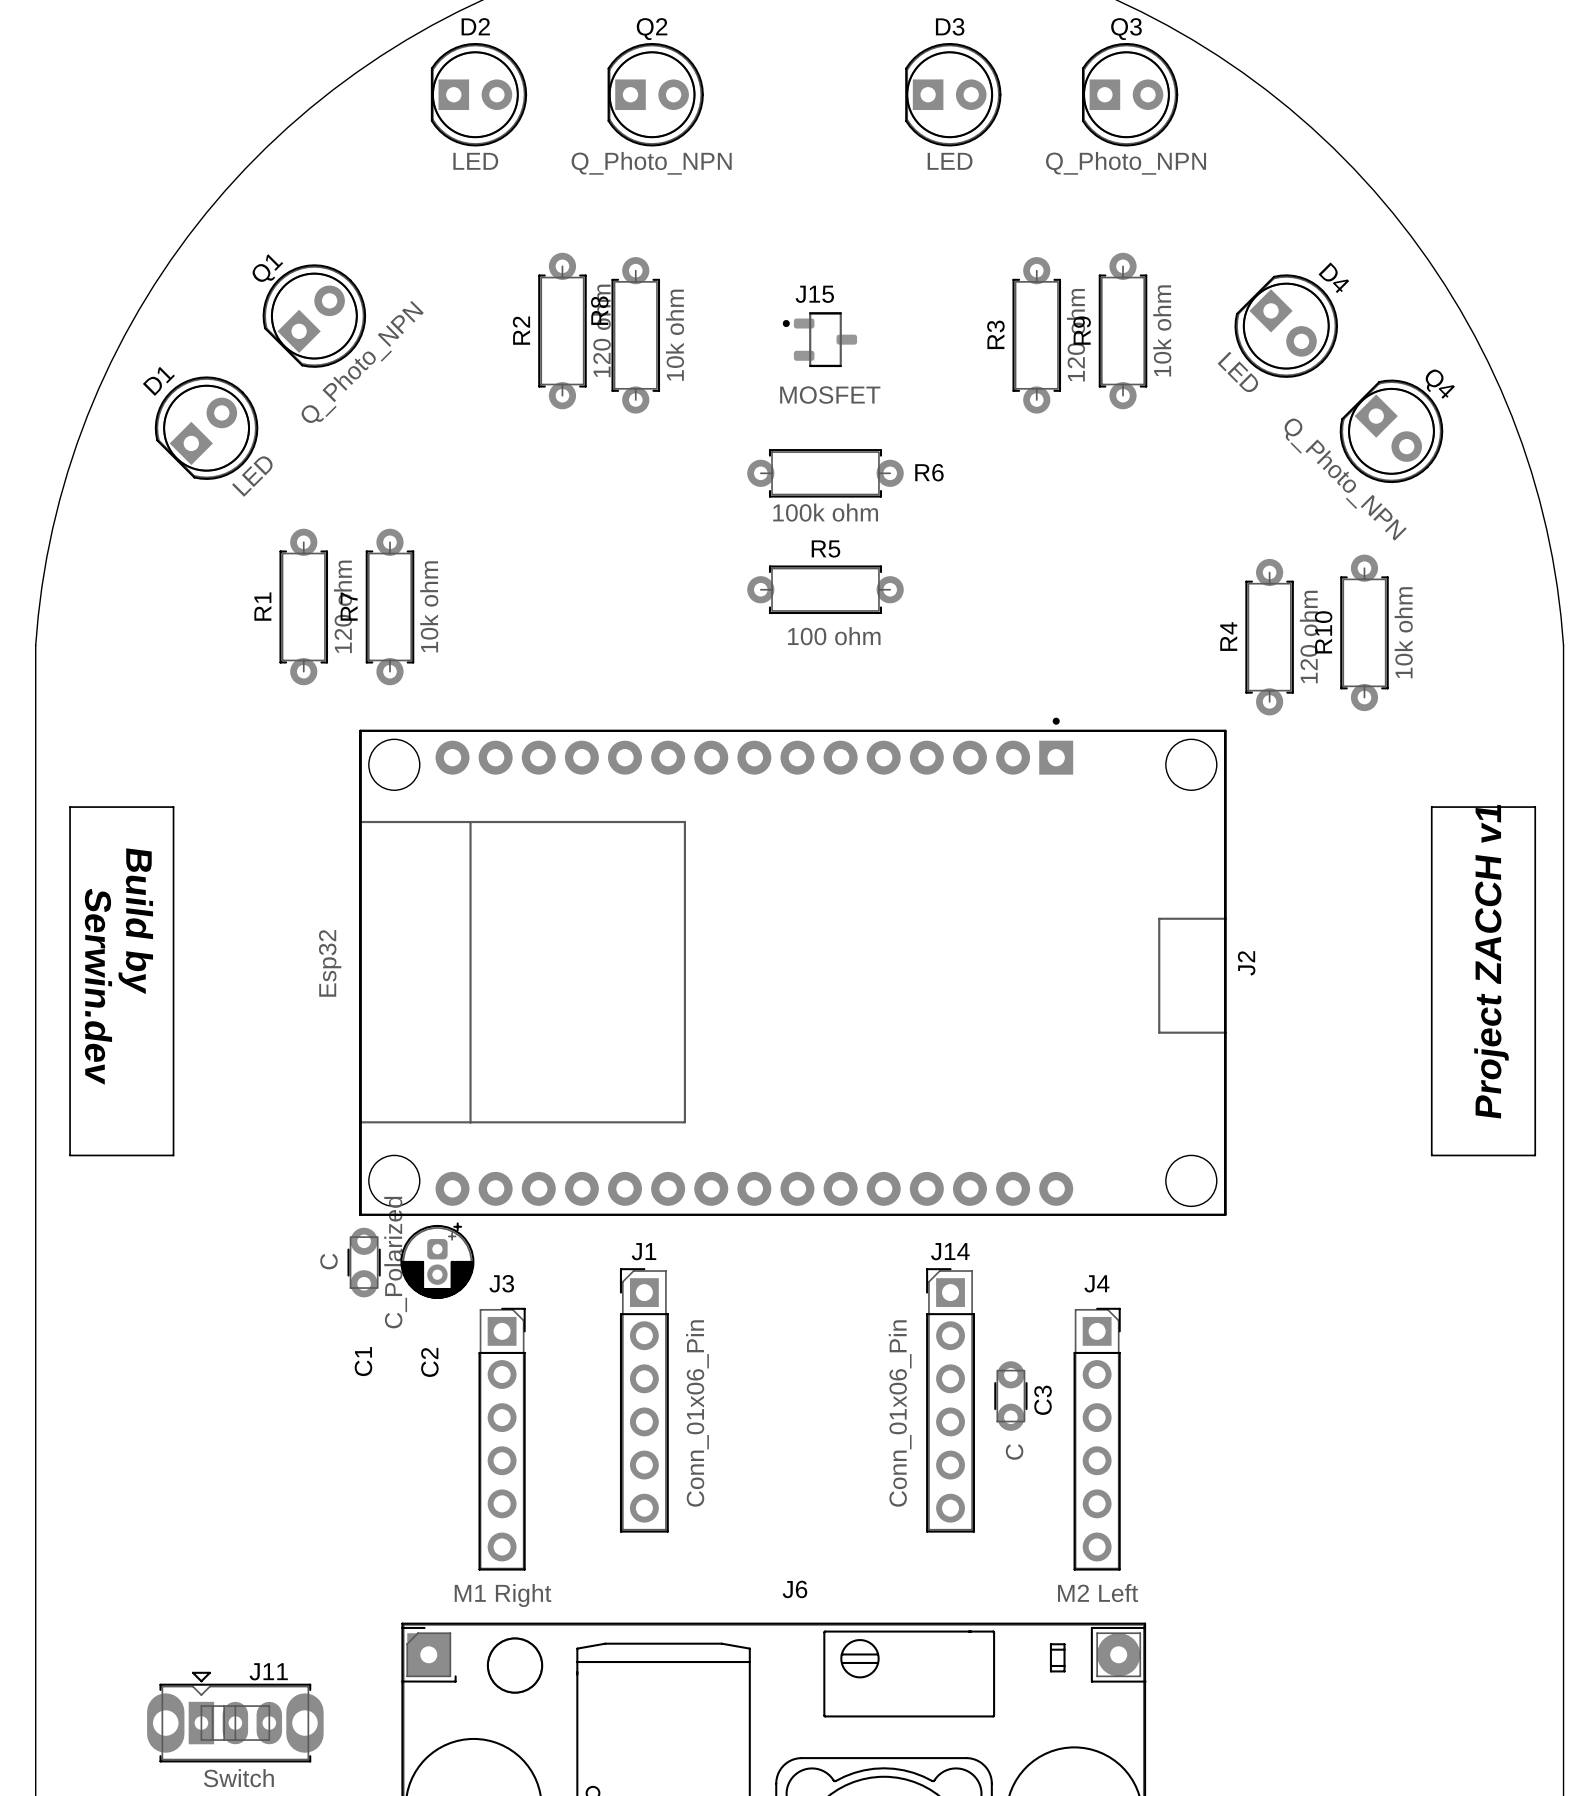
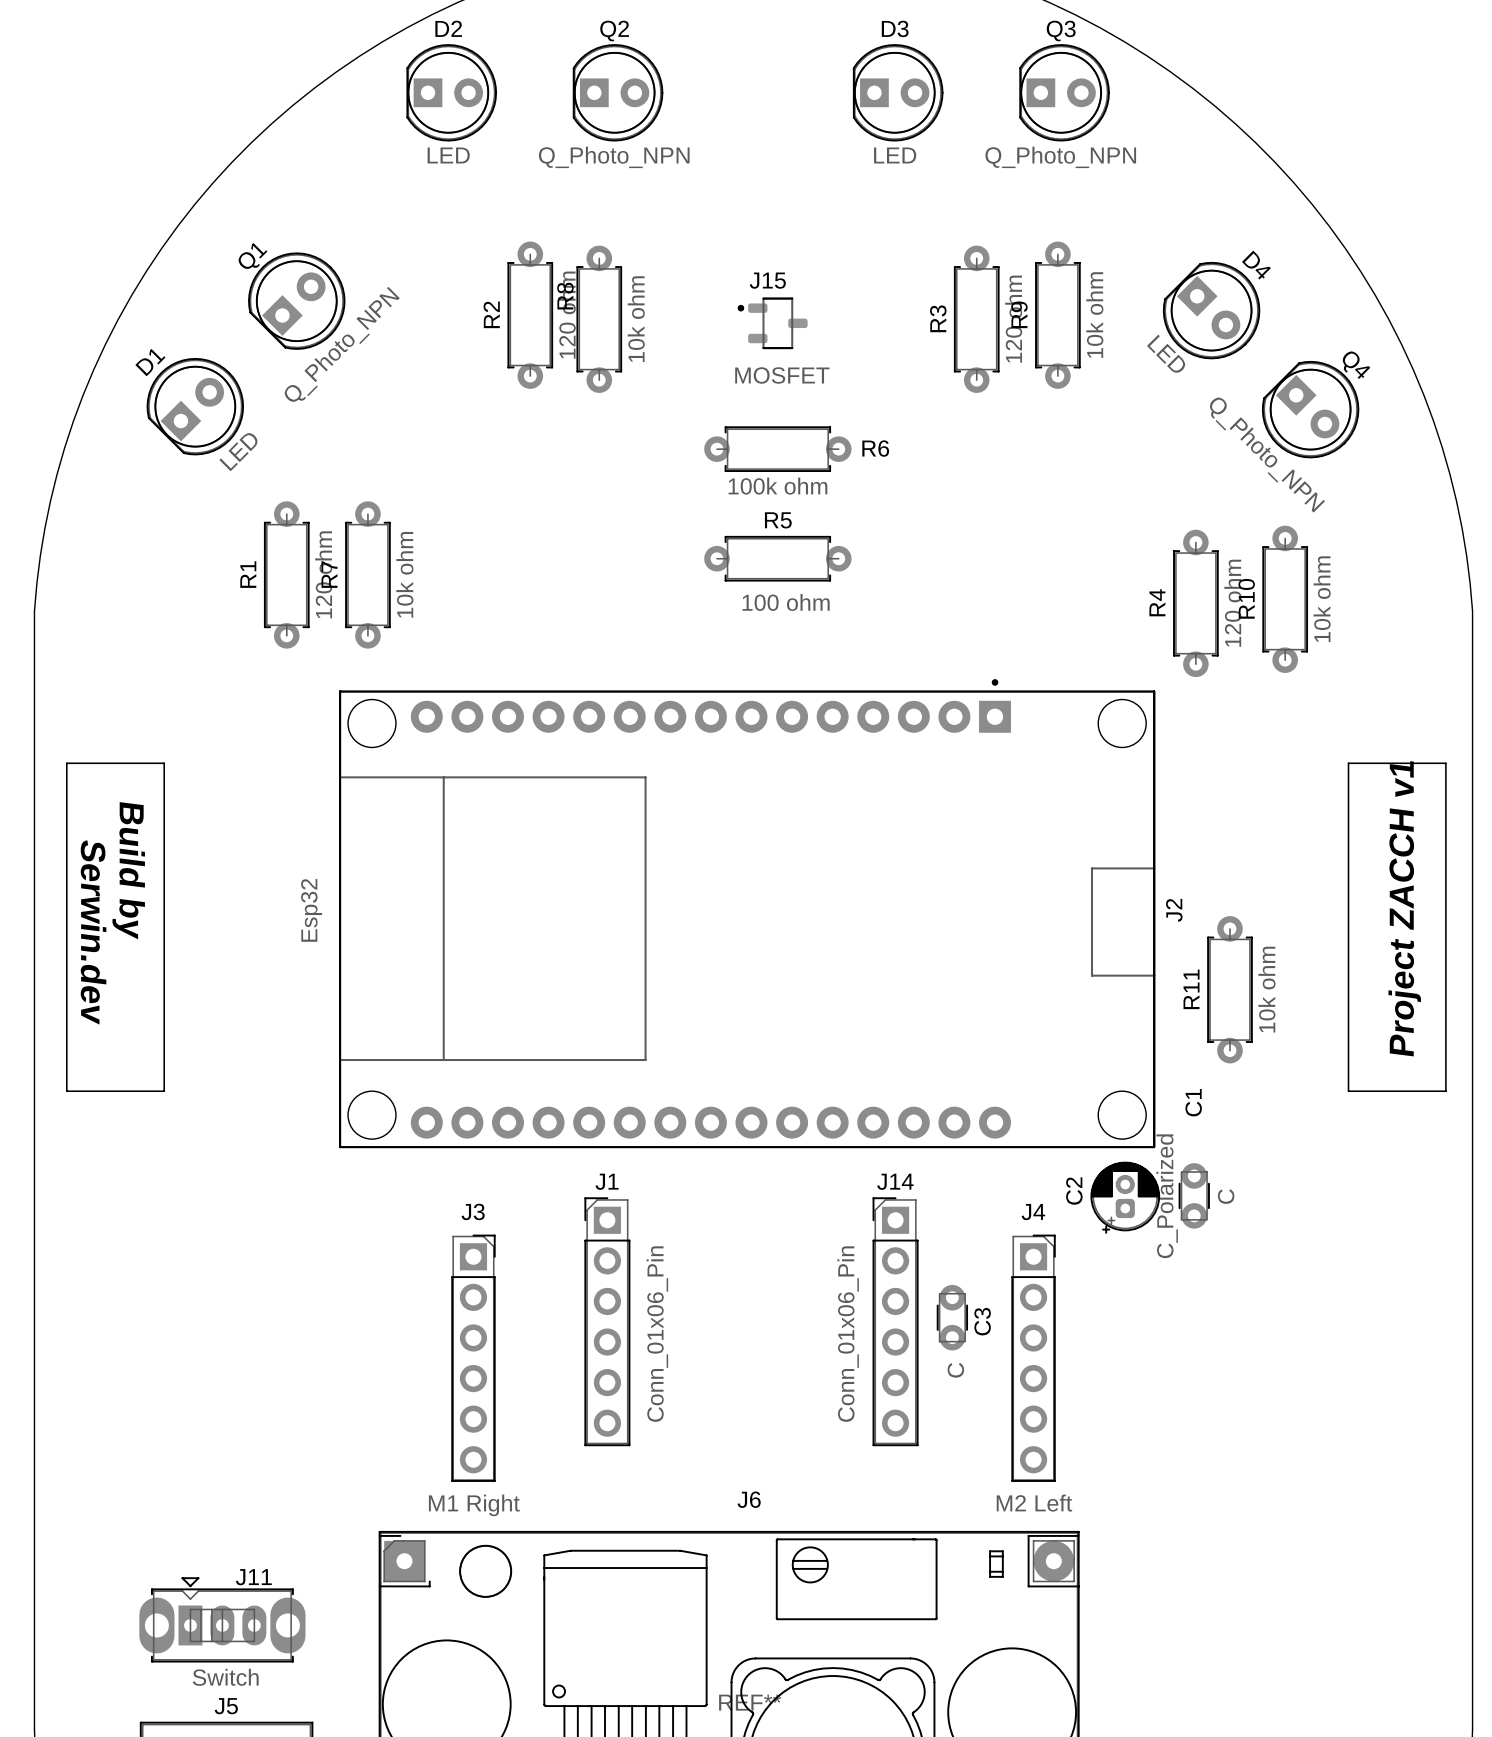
R11: none -> 10k ohm (1229, 989)
C2 rotation: 0° (437, 1260) -> 180° (1125, 1197)
C2 position: (437, 1260) -> (1125, 1197)
C1 value position: C (328, 1261) -> C (1226, 1196)
C1 position: (364, 1262) -> (1194, 1195)
C1 name position: C1 (363, 1361) -> C1 (1193, 1102)
C2 name position: C2 (429, 1362) -> C2 (1074, 1191)

